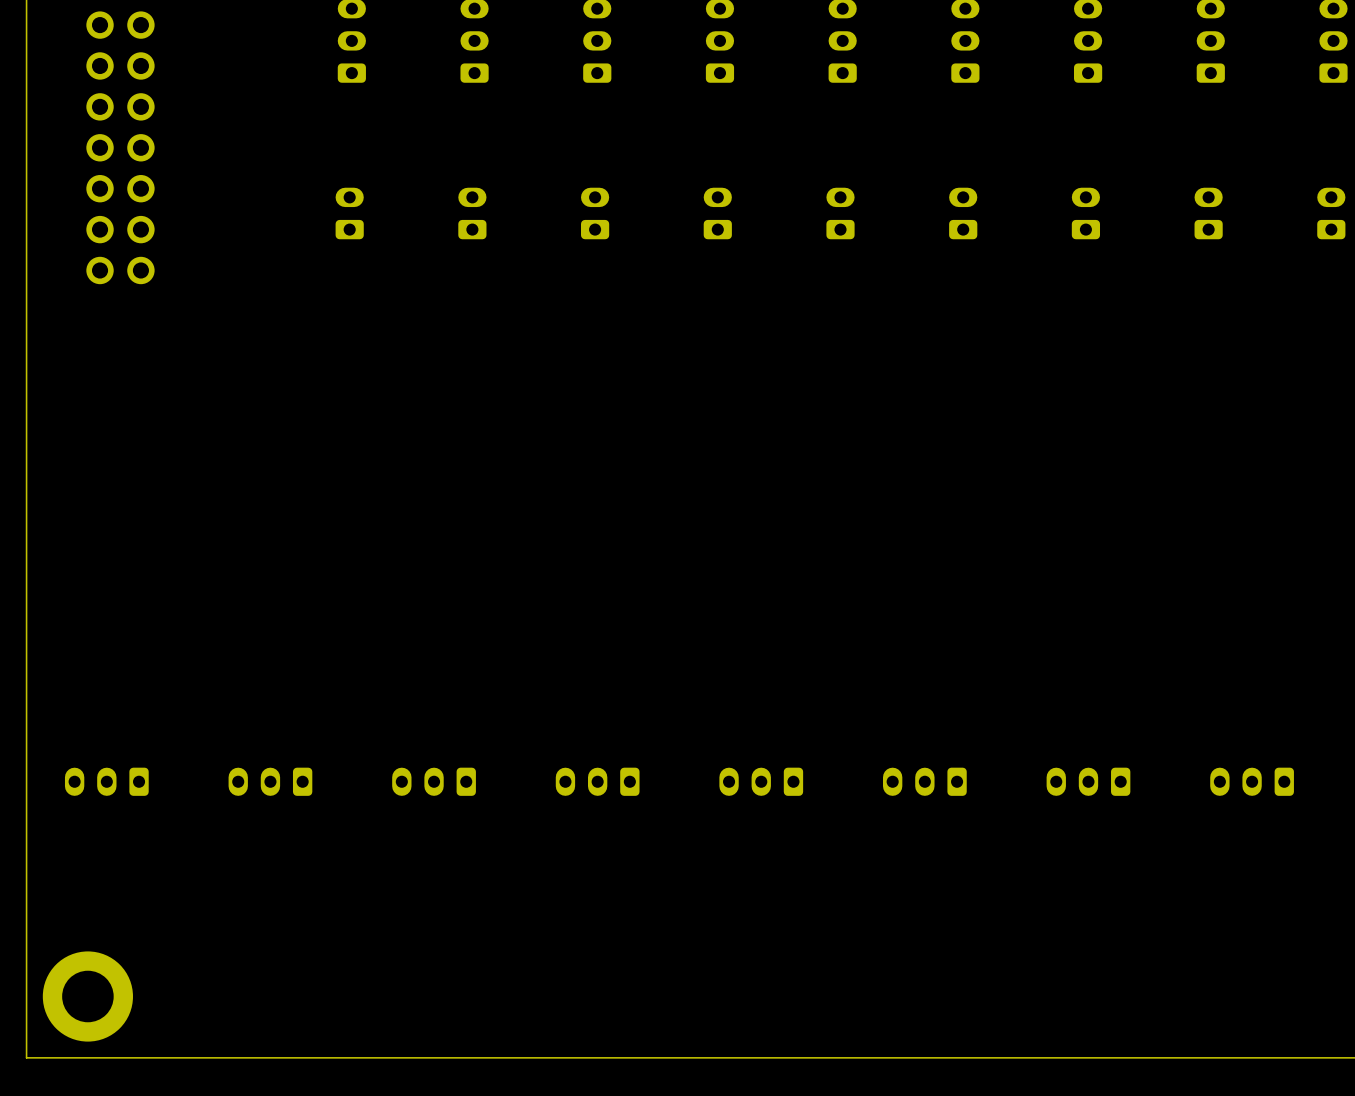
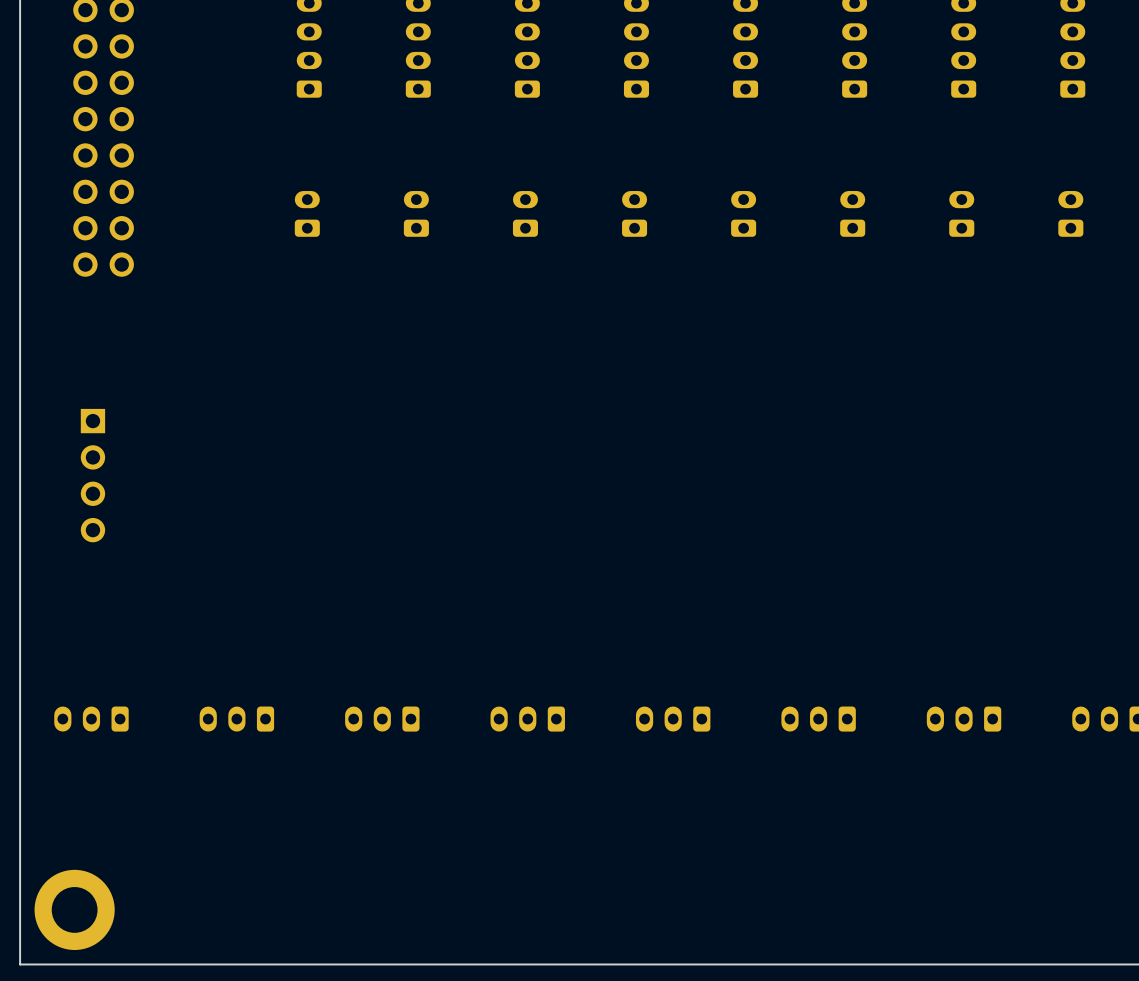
part: none -> (92, 475)

